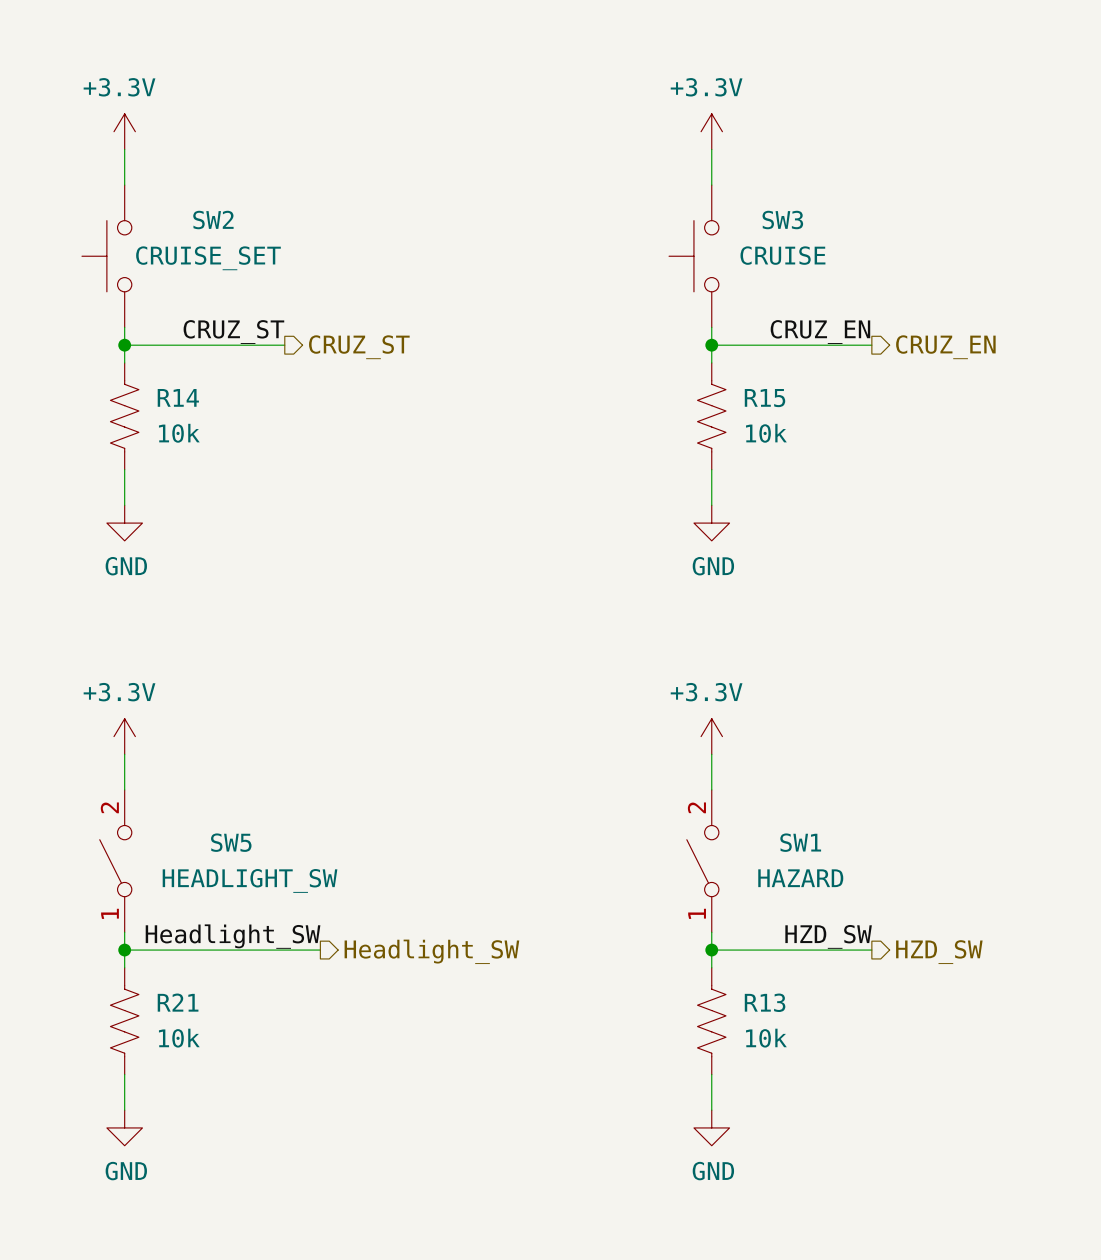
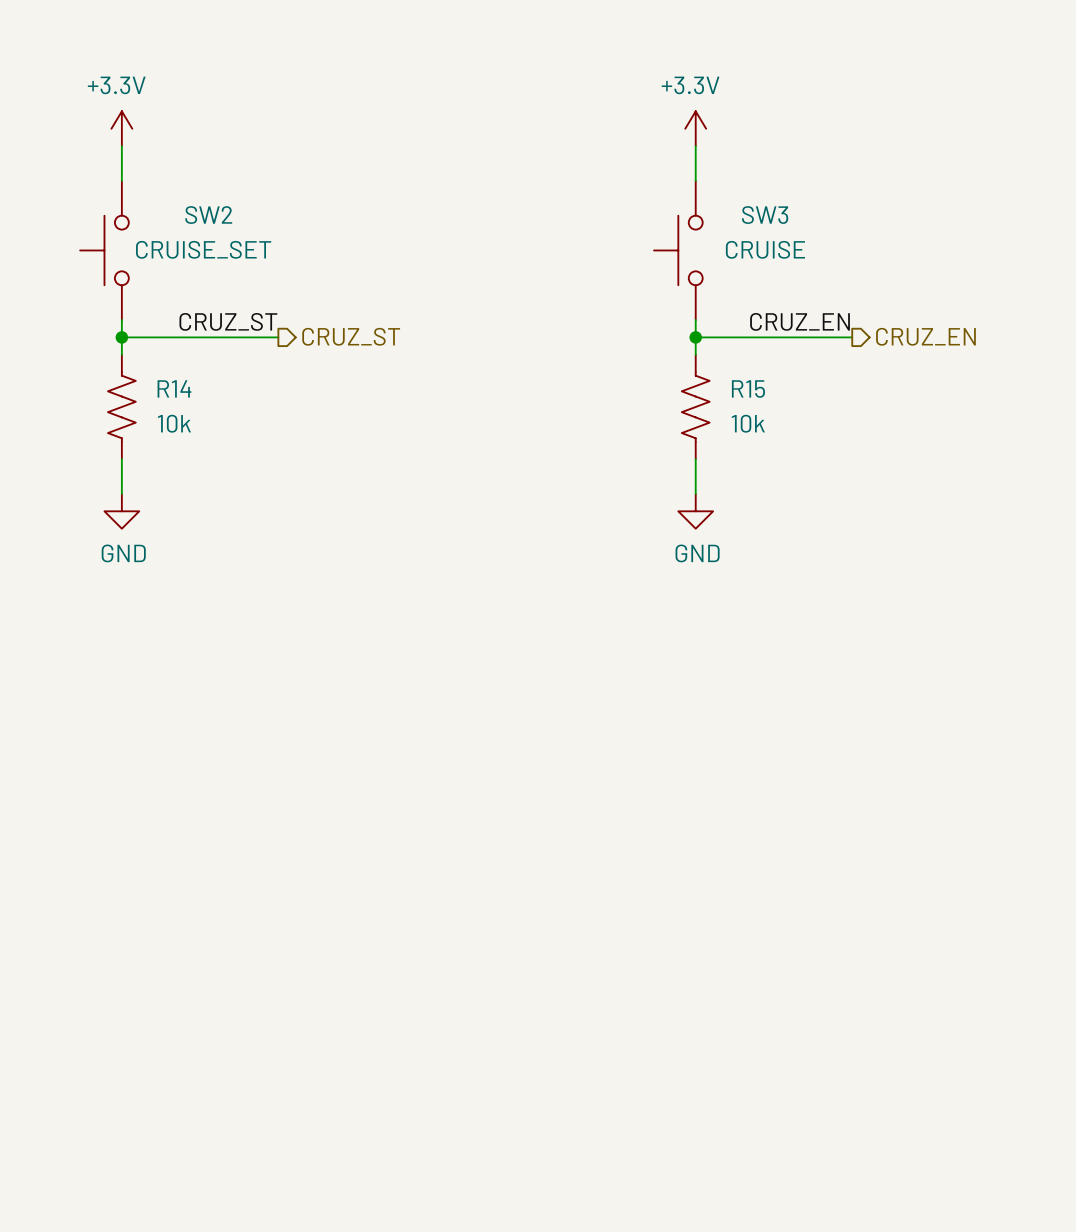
power symbol: +3.3V (124, 736) -> none
power symbol: +3.3V (711, 736) -> none
wire: (124, 754) (124, 789) -> none
wire: (711, 754) (711, 789) -> none
SW5: HEADLIGHT_SW (115, 861) -> none
SW1: HAZARD (702, 861) -> none
wire: (124, 932) (124, 967) -> none
wire: (711, 932) (711, 967) -> none
label: Headlight_SW (233, 936) -> none
label: HZD_SW (828, 936) -> none
wire: (124, 950) (320, 950) -> none
junction: (124, 950) -> none
wire: (711, 950) (871, 950) -> none
junction: (711, 950) -> none
hierarchical label: Headlight_SW (431, 951) -> none
hierarchical label: HZD_SW (939, 952) -> none
R21: 10k (124, 1021) -> none
R13: 10k (711, 1021) -> none
wire: (124, 1074) (124, 1110) -> none
wire: (711, 1074) (711, 1110) -> none
power symbol: GND (124, 1127) -> none
power symbol: GND (711, 1127) -> none

